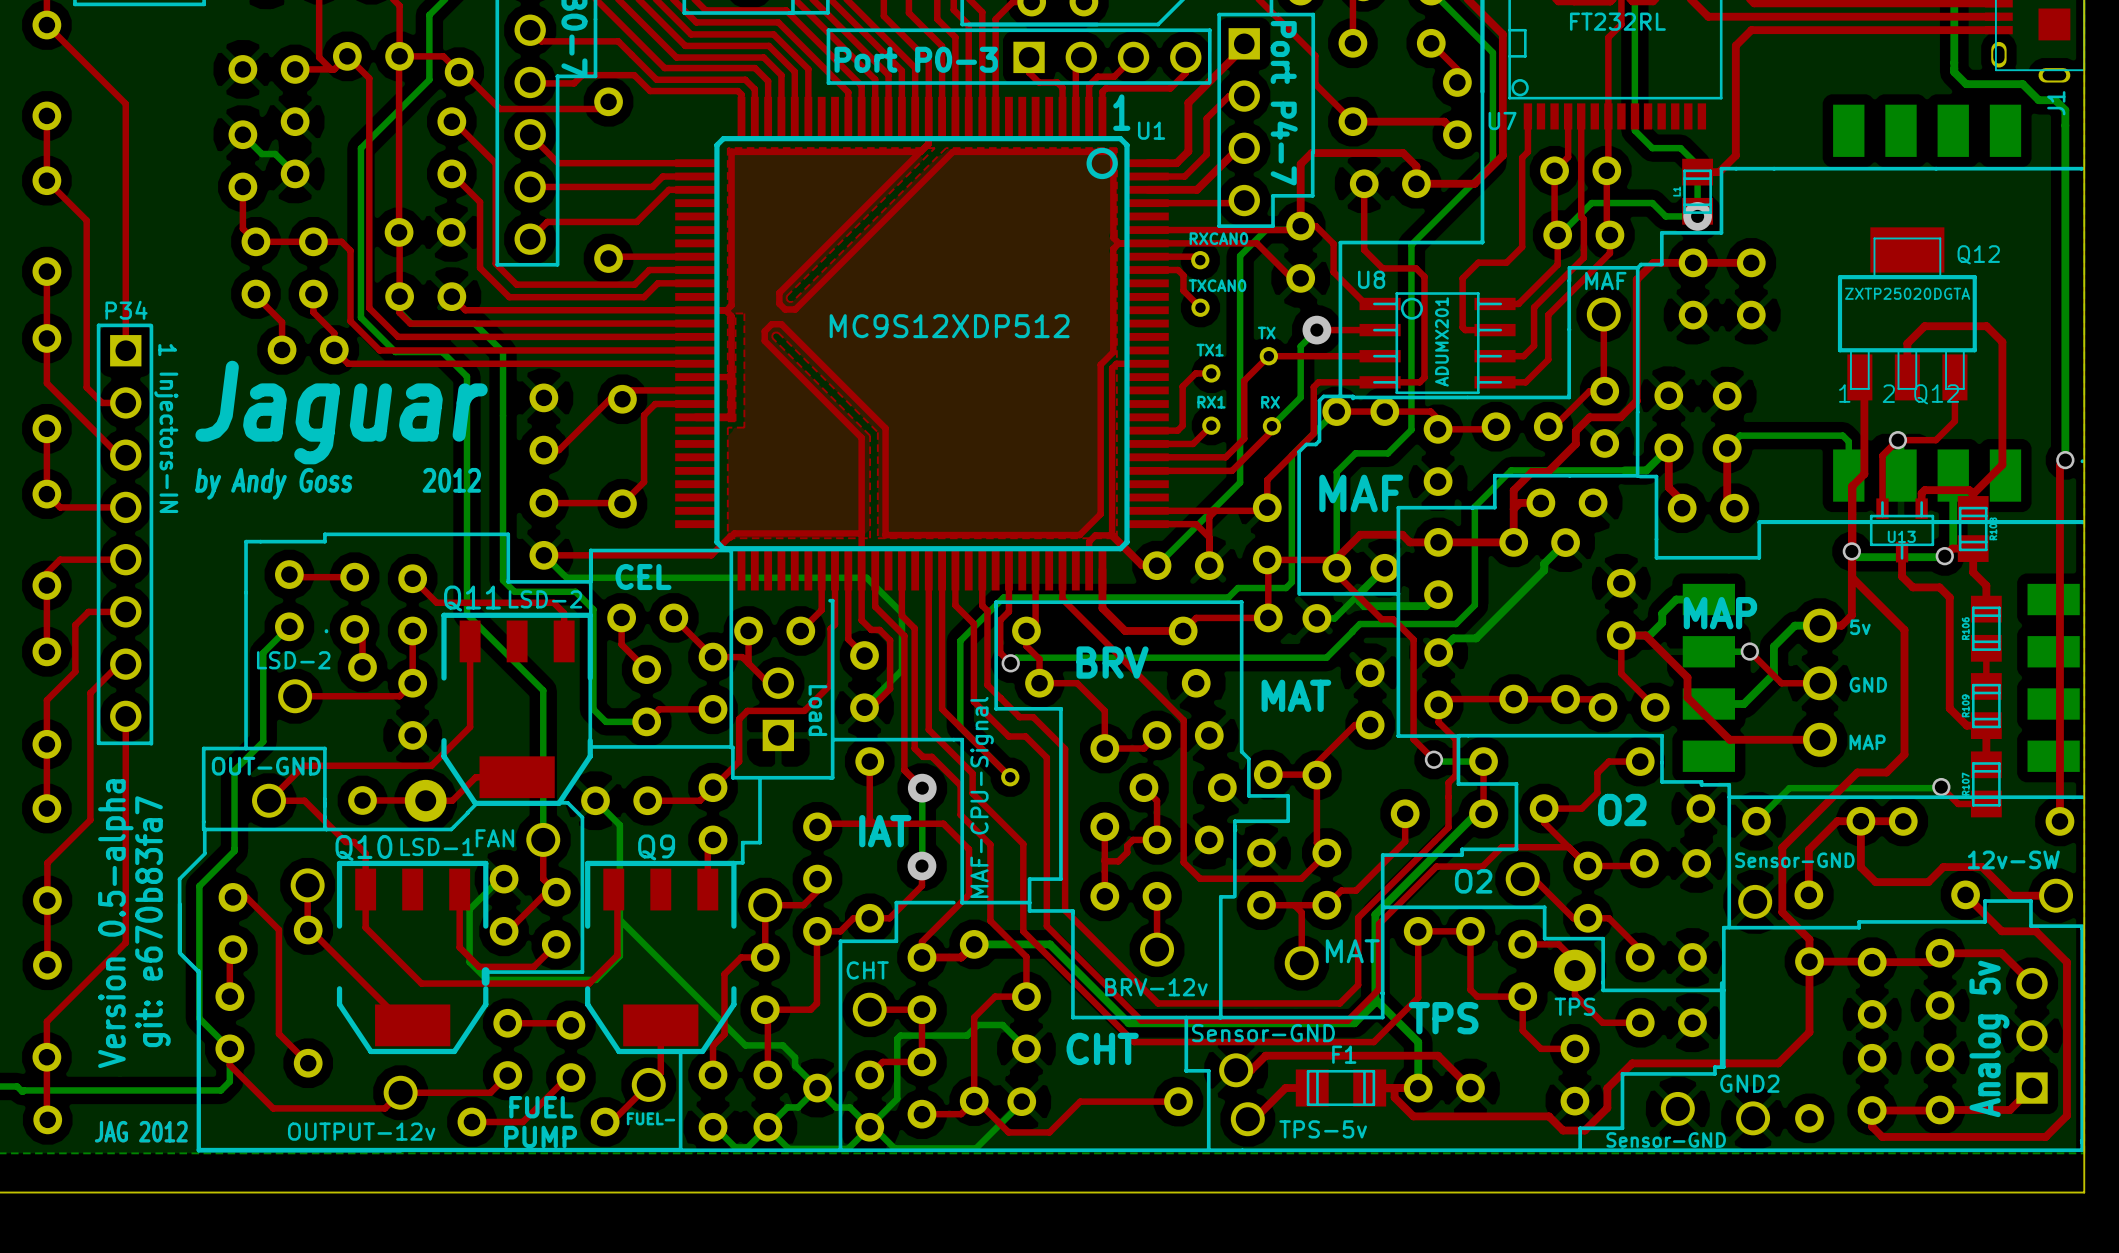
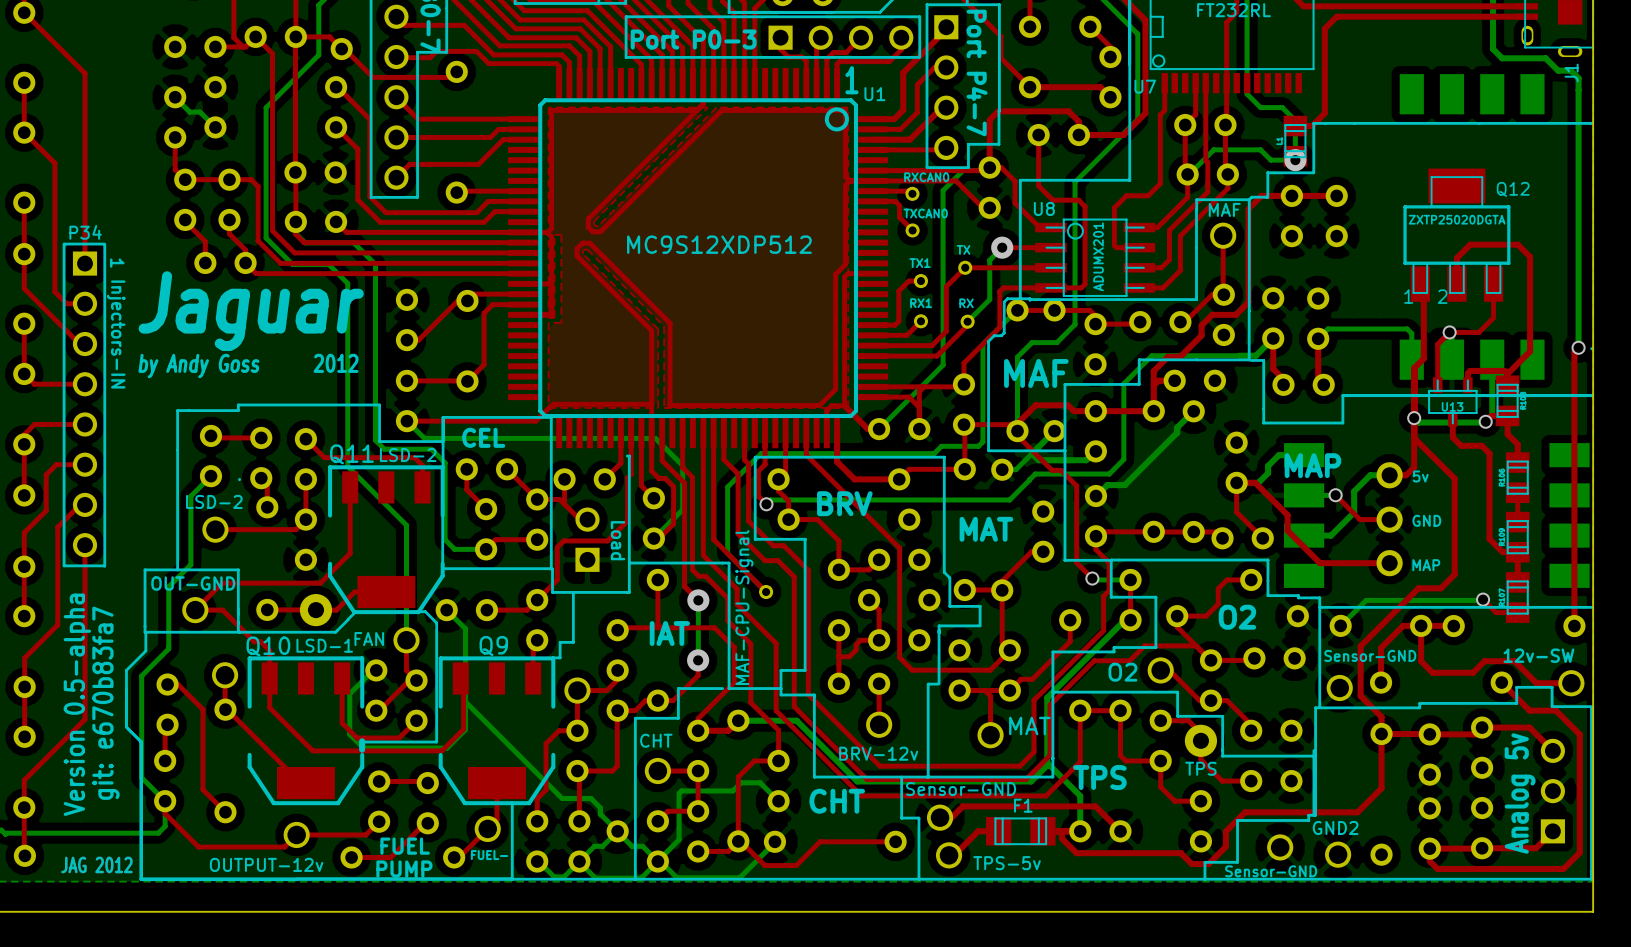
Q12 text: Q12 (1978, 254) -> none
Q12 name position: Q12 (1936, 394) -> Q12 (1513, 189)

